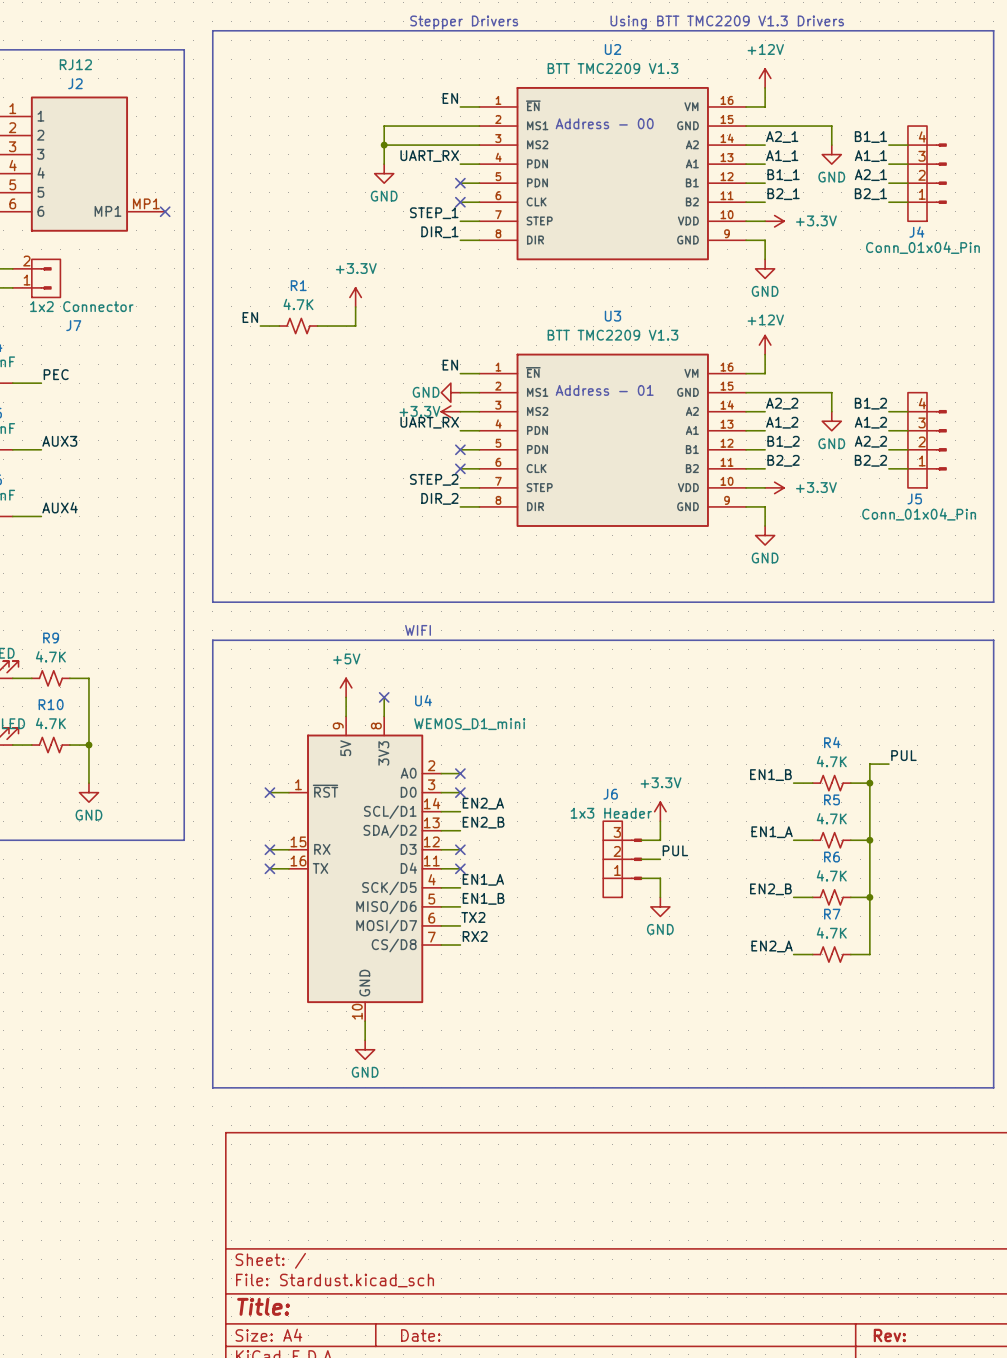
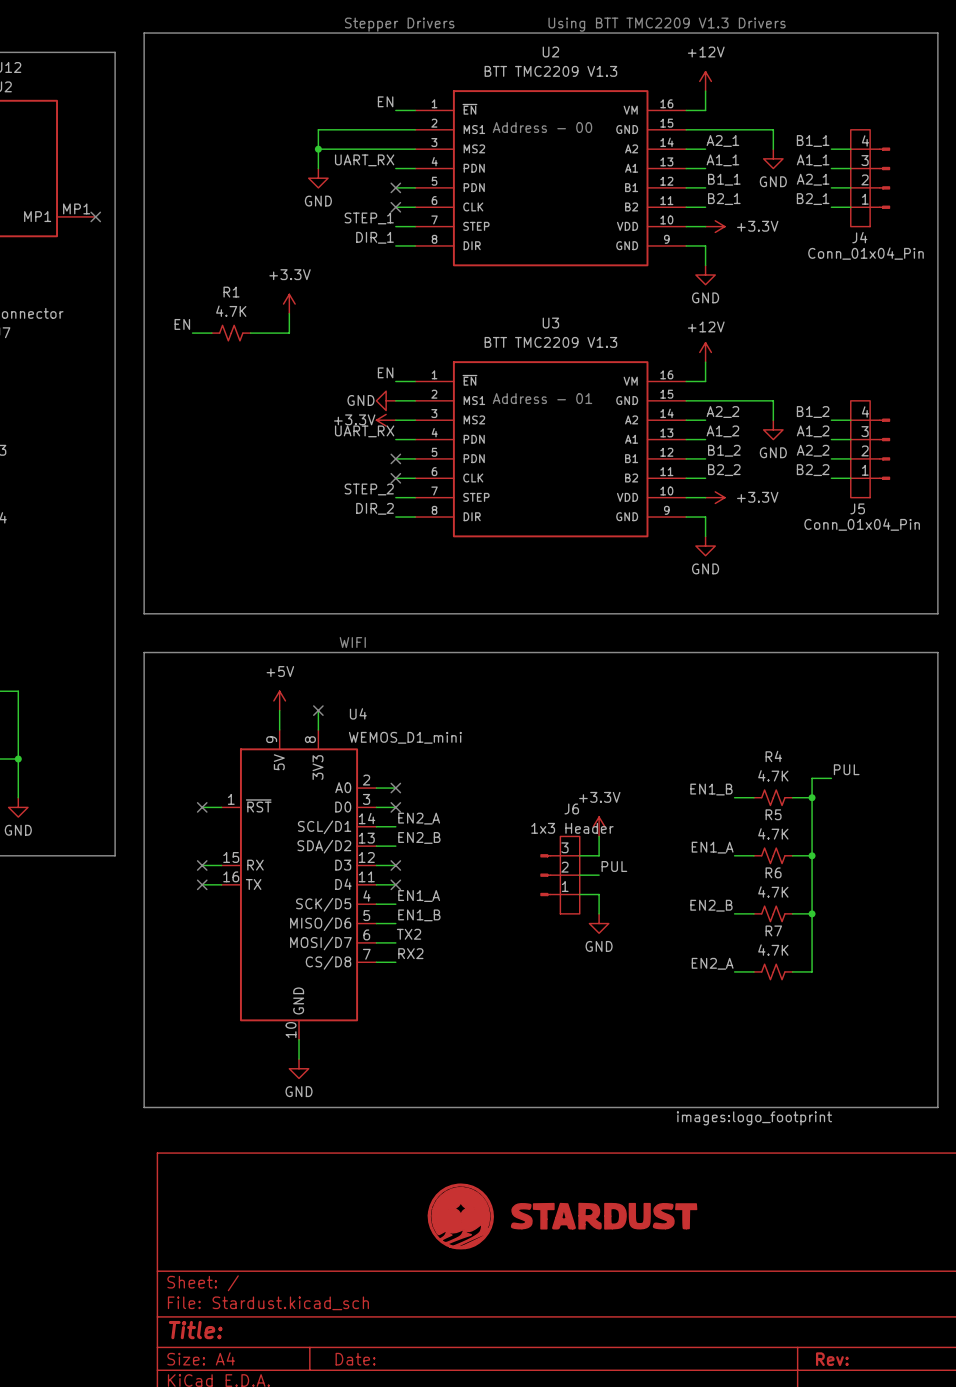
J6 flip: as is (622, 859) -> left-right (560, 875)
part: none -> (562, 1216)

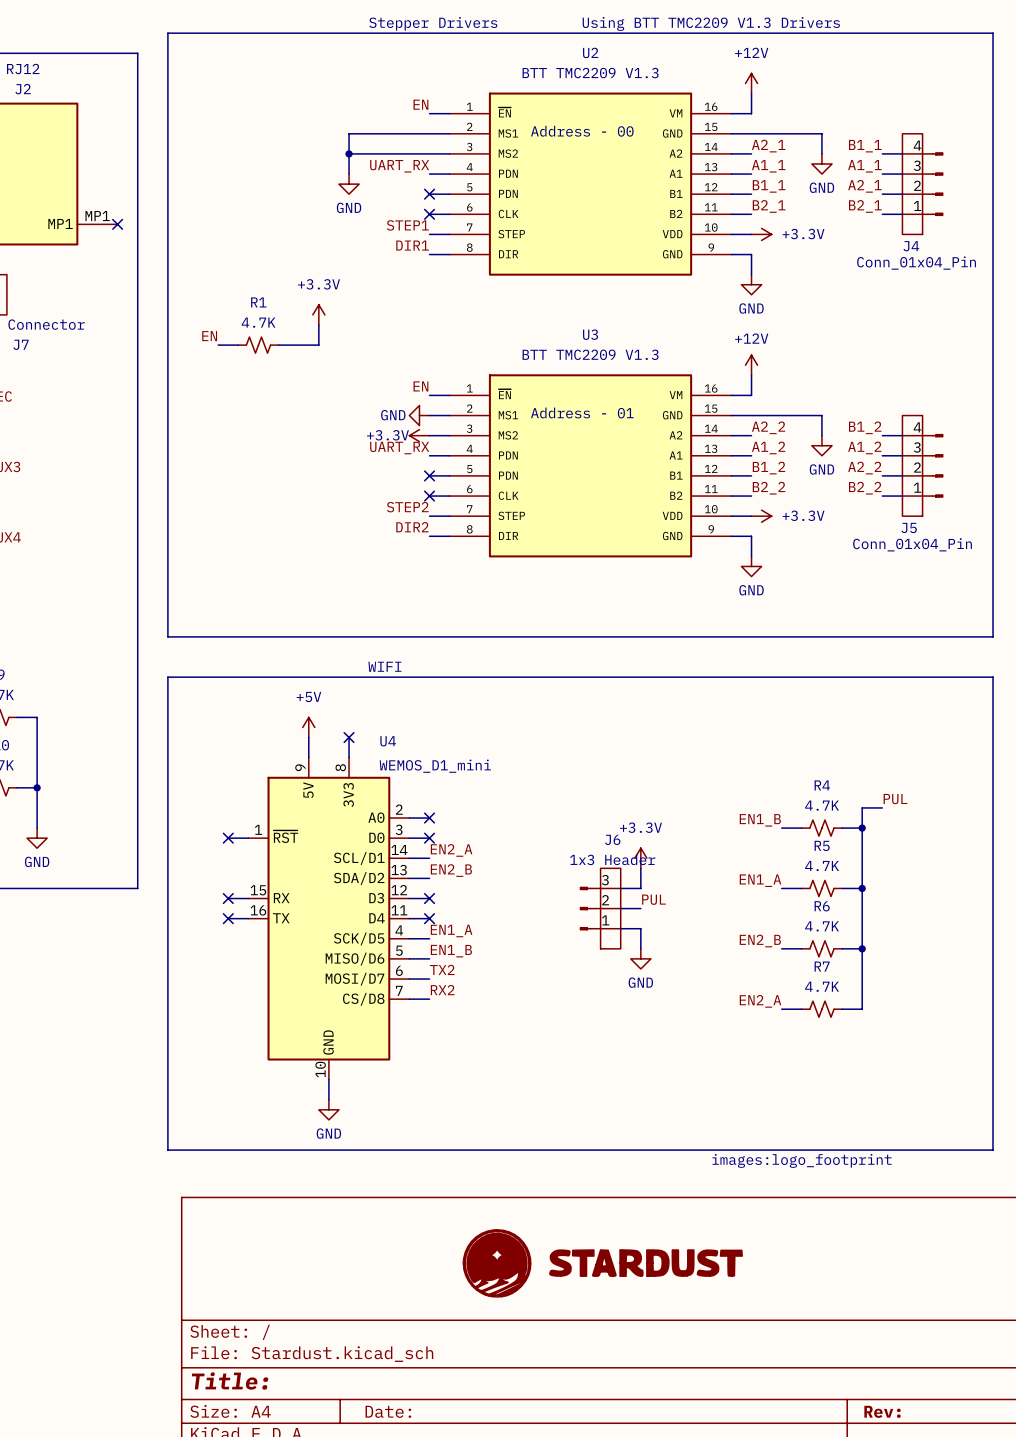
label: STEP_1 (369, 218) -> STEP1 (407, 225)
label: DIR_1 (375, 237) -> DIR1 (412, 245)
label: STEP_2 (369, 489) -> STEP2 (407, 507)
label: DIR_2 (375, 508) -> DIR2 (412, 527)

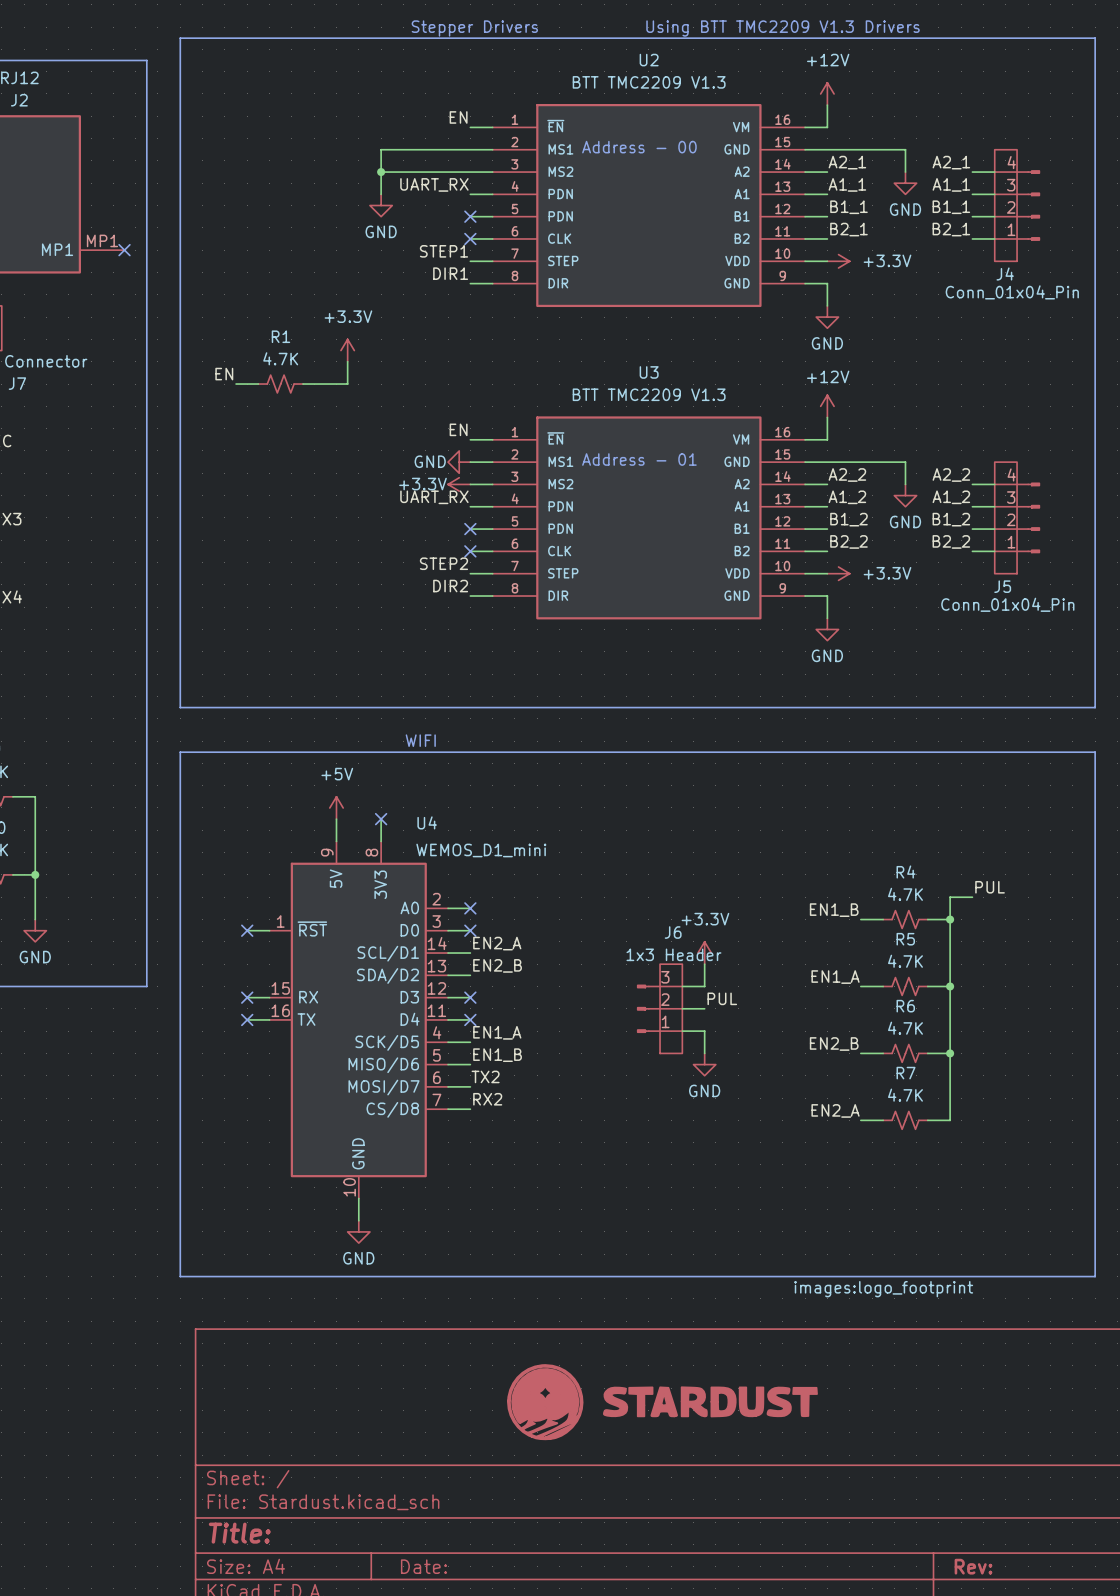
label: B1_1 (865, 146) -> A2_1 (951, 162)
label: A2_1 (864, 186) -> B1_1 (951, 207)
label: B1_2 (865, 427) -> A2_2 (951, 475)
label: A2_2 (864, 468) -> B1_2 (951, 519)

